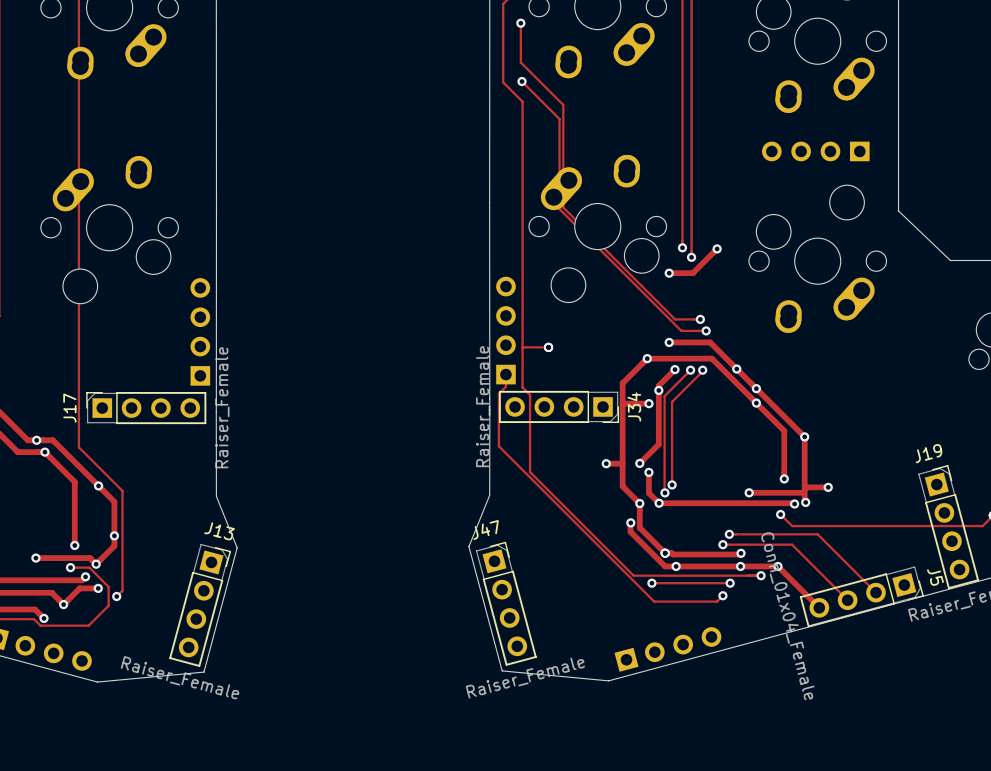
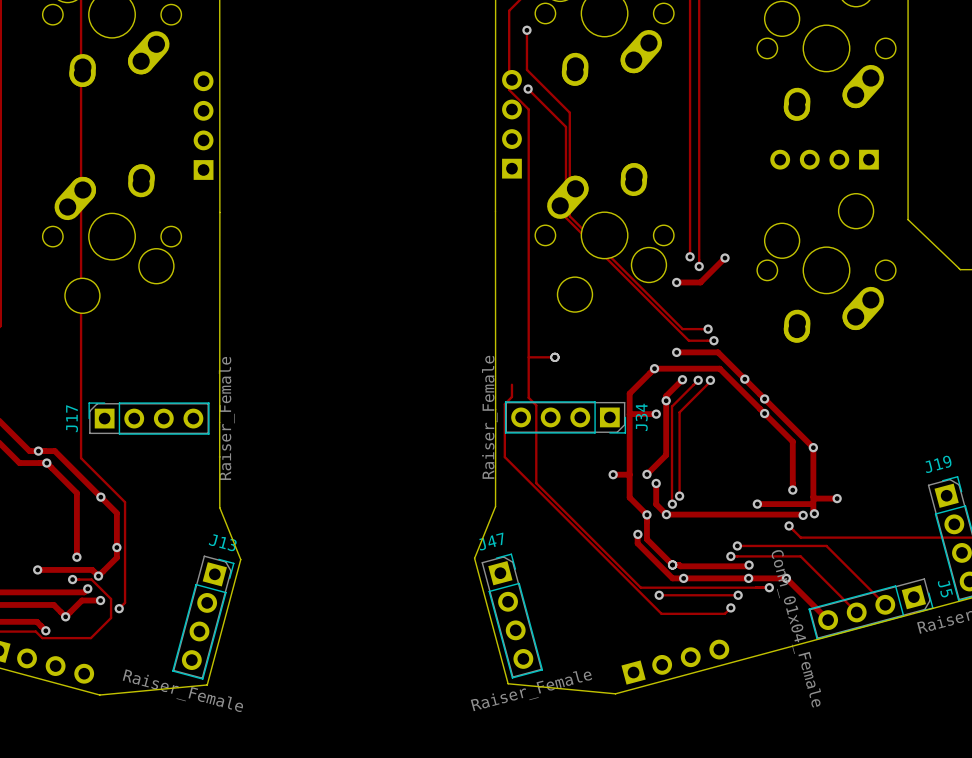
part: none -> (511, 124)
part: none -> (203, 125)
part: (505, 330) -> none
part: (200, 331) -> none

